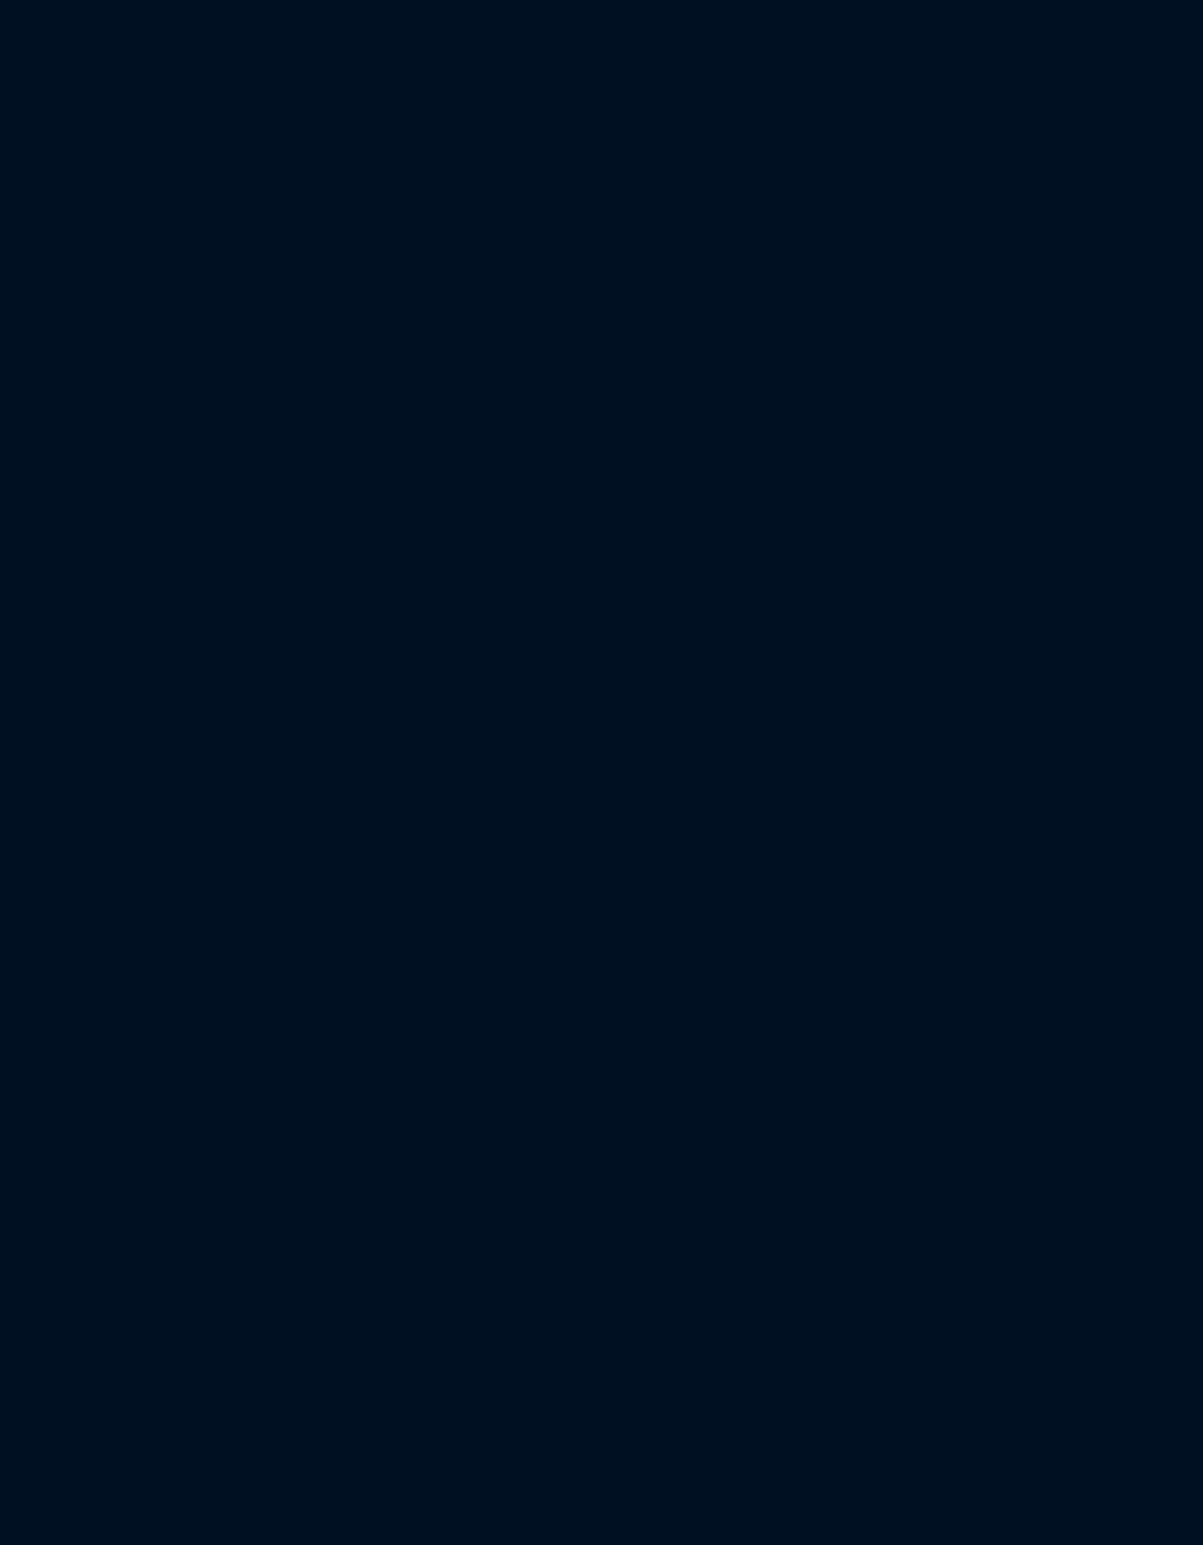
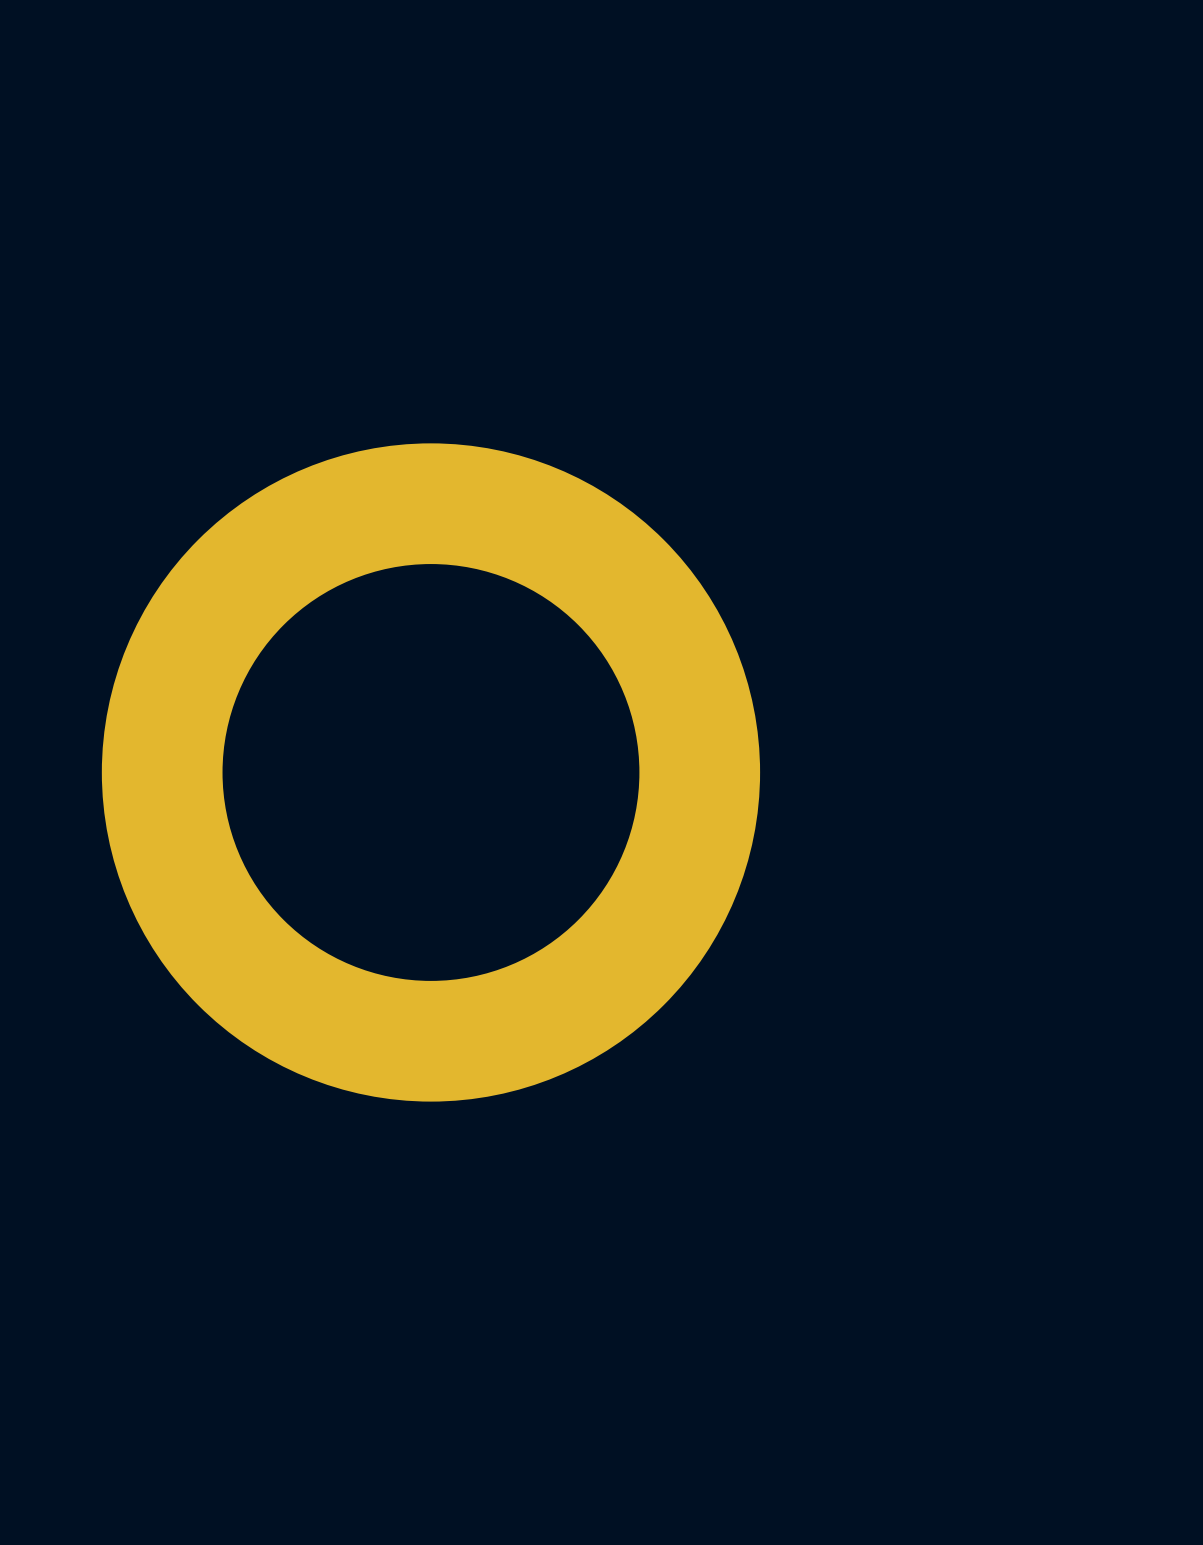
part: none -> (430, 772)

